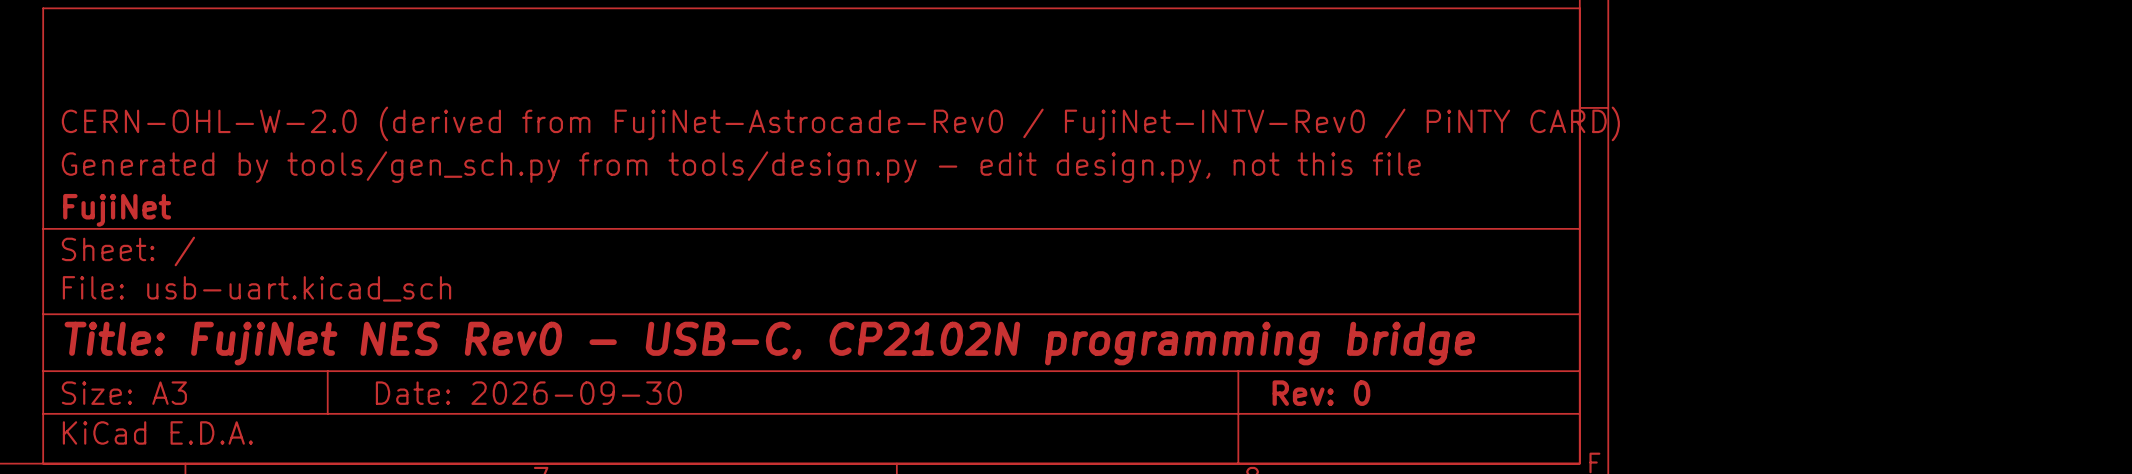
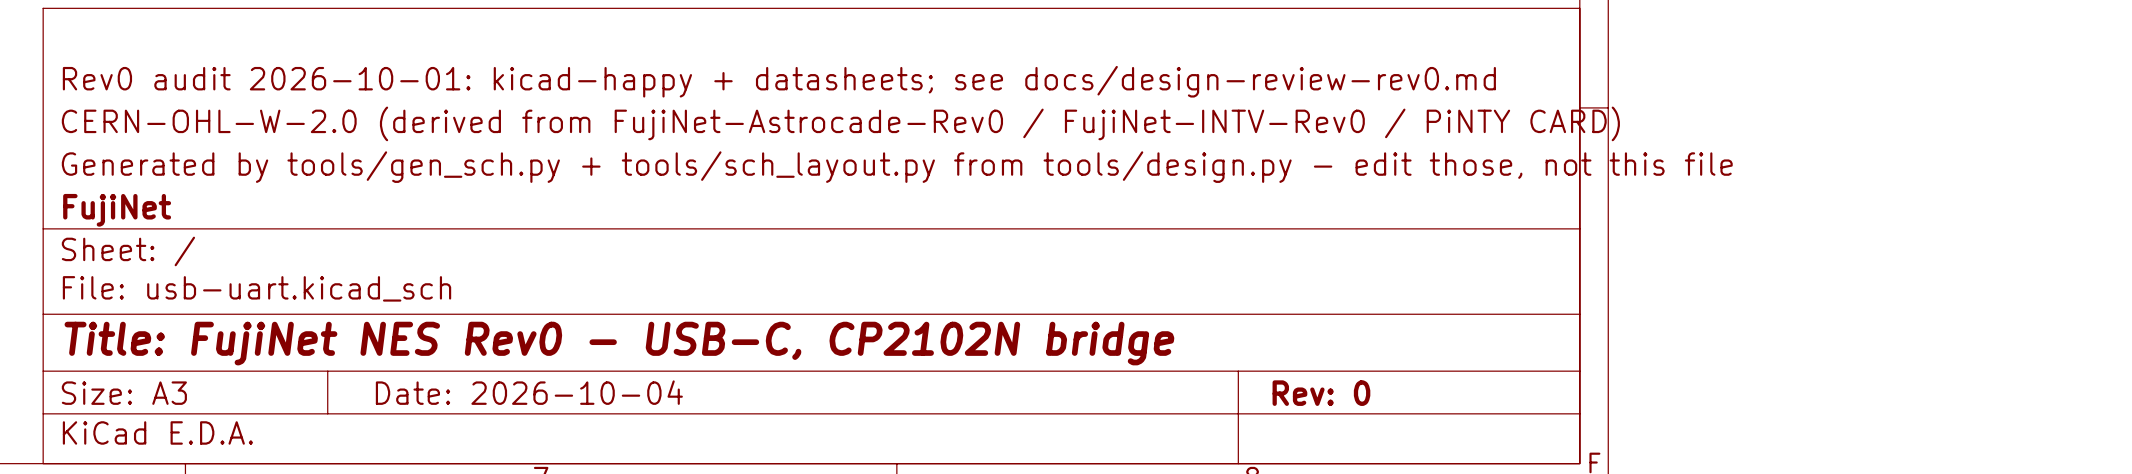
title block: none -> Rev0 audit 2026-10-01: kicad-happy + datasheets; see docs/design-review-rev0.md (779, 81)
title block: Generated by tools/gen_sch.py from tools/design.py - edit design.py, not this file (741, 167) -> Generated by tools/gen_sch.py + tools/sch_layout.py from tools/design.py - edit those, not this file (897, 167)
title block: Title: FujiNet NES Rev0 - USB-C, CP2102N programming bridge (769, 343) -> Title: FujiNet NES Rev0 - USB-C, CP2102N bridge (619, 343)
title block: Date: 2026-09-30 (528, 393) -> Date: 2026-10-04 (529, 392)

